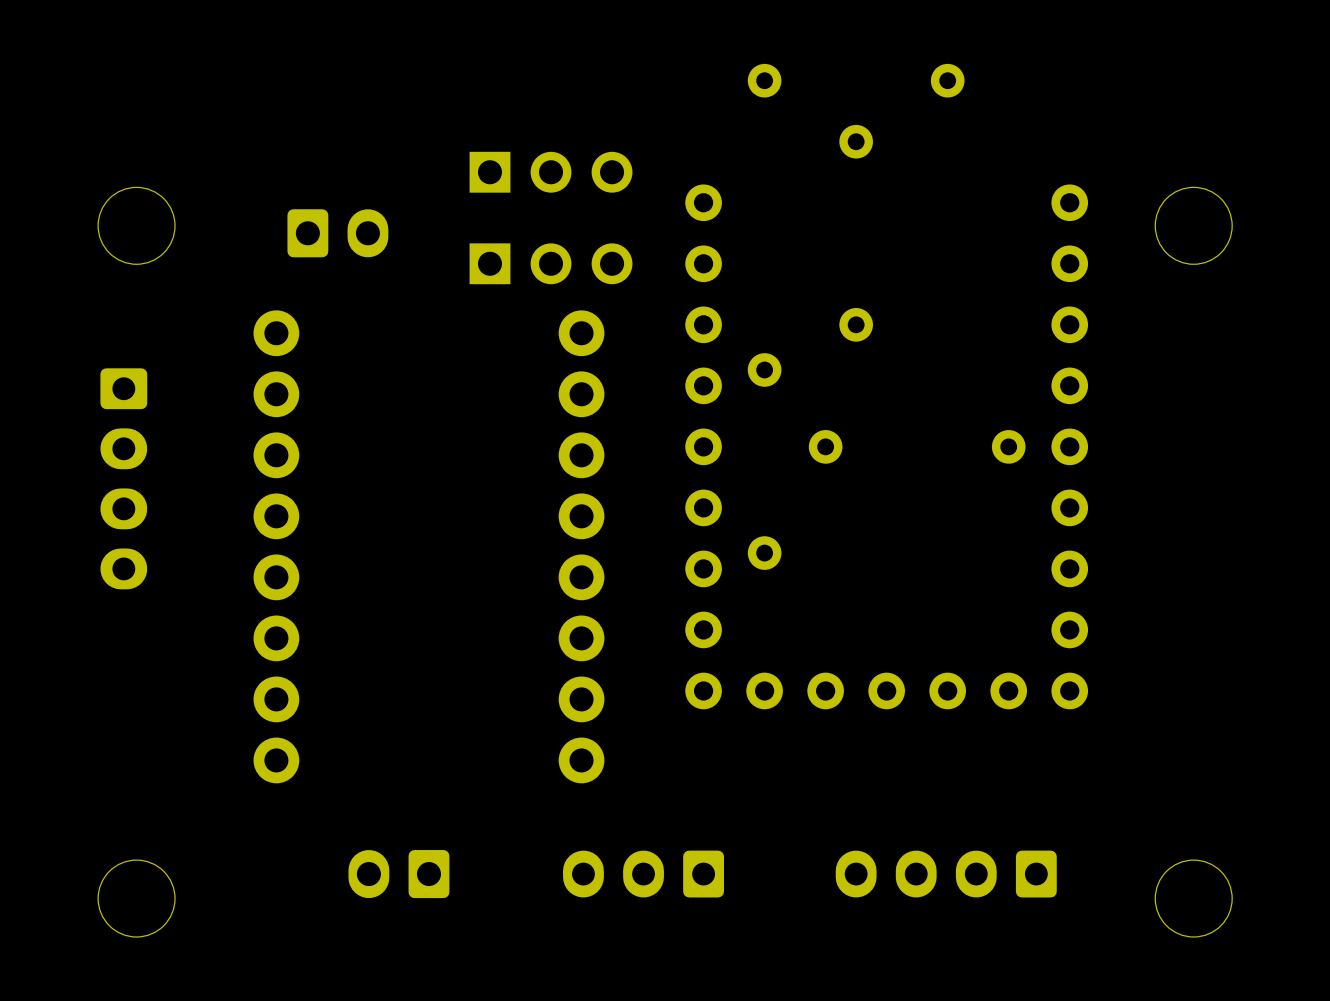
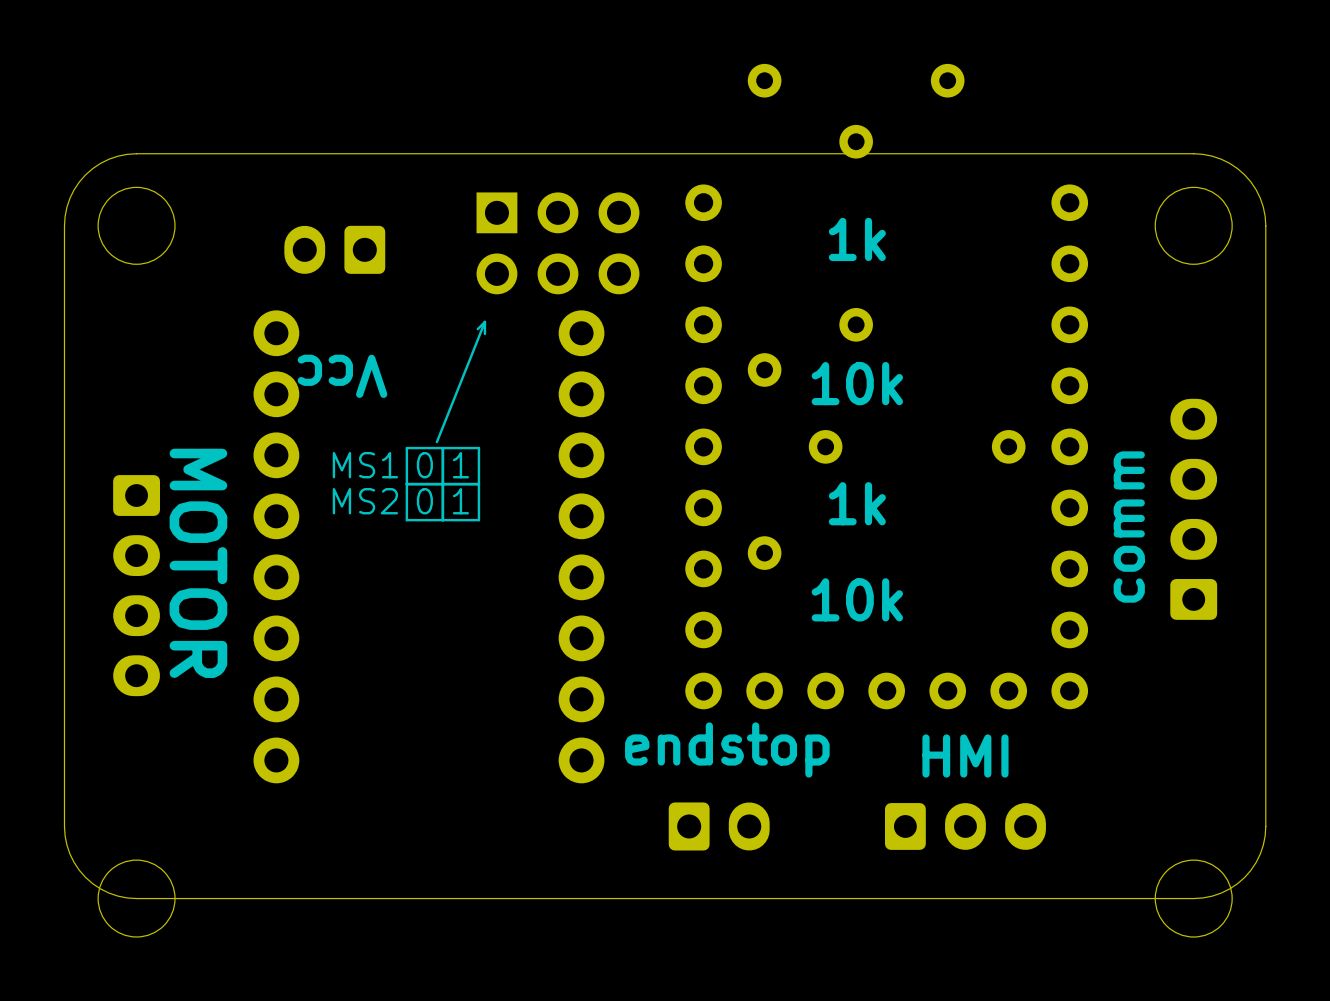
board edge: none -> (1193, 153) (136, 153) (117, 156) (100, 163) (85, 174) (74, 189) (66, 207) (64, 225) (64, 826) (66, 845) (74, 862) (85, 877) (100, 888) (117, 896) (136, 898) (1193, 898) (1212, 896) (1229, 888) (1244, 877) (1256, 862) (1263, 845) (1265, 826) (1265, 225) (1260, 198) (1244, 174) (1221, 159) (1193, 153)
part: (551, 172) -> none
part rotation: 0° (337, 233) -> 180° (334, 249)
text: none -> 1k (857, 239)
part footprint: [469, 243, 633, 285] -> [476, 192, 640, 295]
line: none -> (484, 321) (436, 442)
line: none -> (484, 321) (484, 333)
line: none -> (484, 321) (477, 329)
text: none -> Vcc (342, 376)
text: none -> 10k (857, 383)
line: none -> (442, 448) (442, 520)
line: none -> (478, 448) (478, 520) (406, 520) (406, 448) (478, 448)
text: none -> MS1 (365, 465)
text: none -> 0 (424, 465)
text: none -> 1 (460, 465)
part position: (123, 478) -> (136, 585)
line: none -> (478, 484) (406, 484)
text: none -> MS2 (365, 501)
text: none -> 0 (424, 501)
text: none -> 1 (460, 501)
text: none -> 1k (857, 503)
part: none -> (1193, 509)
text: none -> comm (1129, 527)
text: none -> MOTOR (198, 563)
text: none -> 10k (857, 599)
text: none -> endstop (727, 749)
text: none -> HMI (965, 755)
part rotation: 0° (398, 874) -> 180° (719, 826)
part position: (398, 874) -> (719, 826)
part rotation: 0° (643, 874) -> 180° (965, 826)
part position: (643, 874) -> (965, 826)
part: (946, 874) -> none

